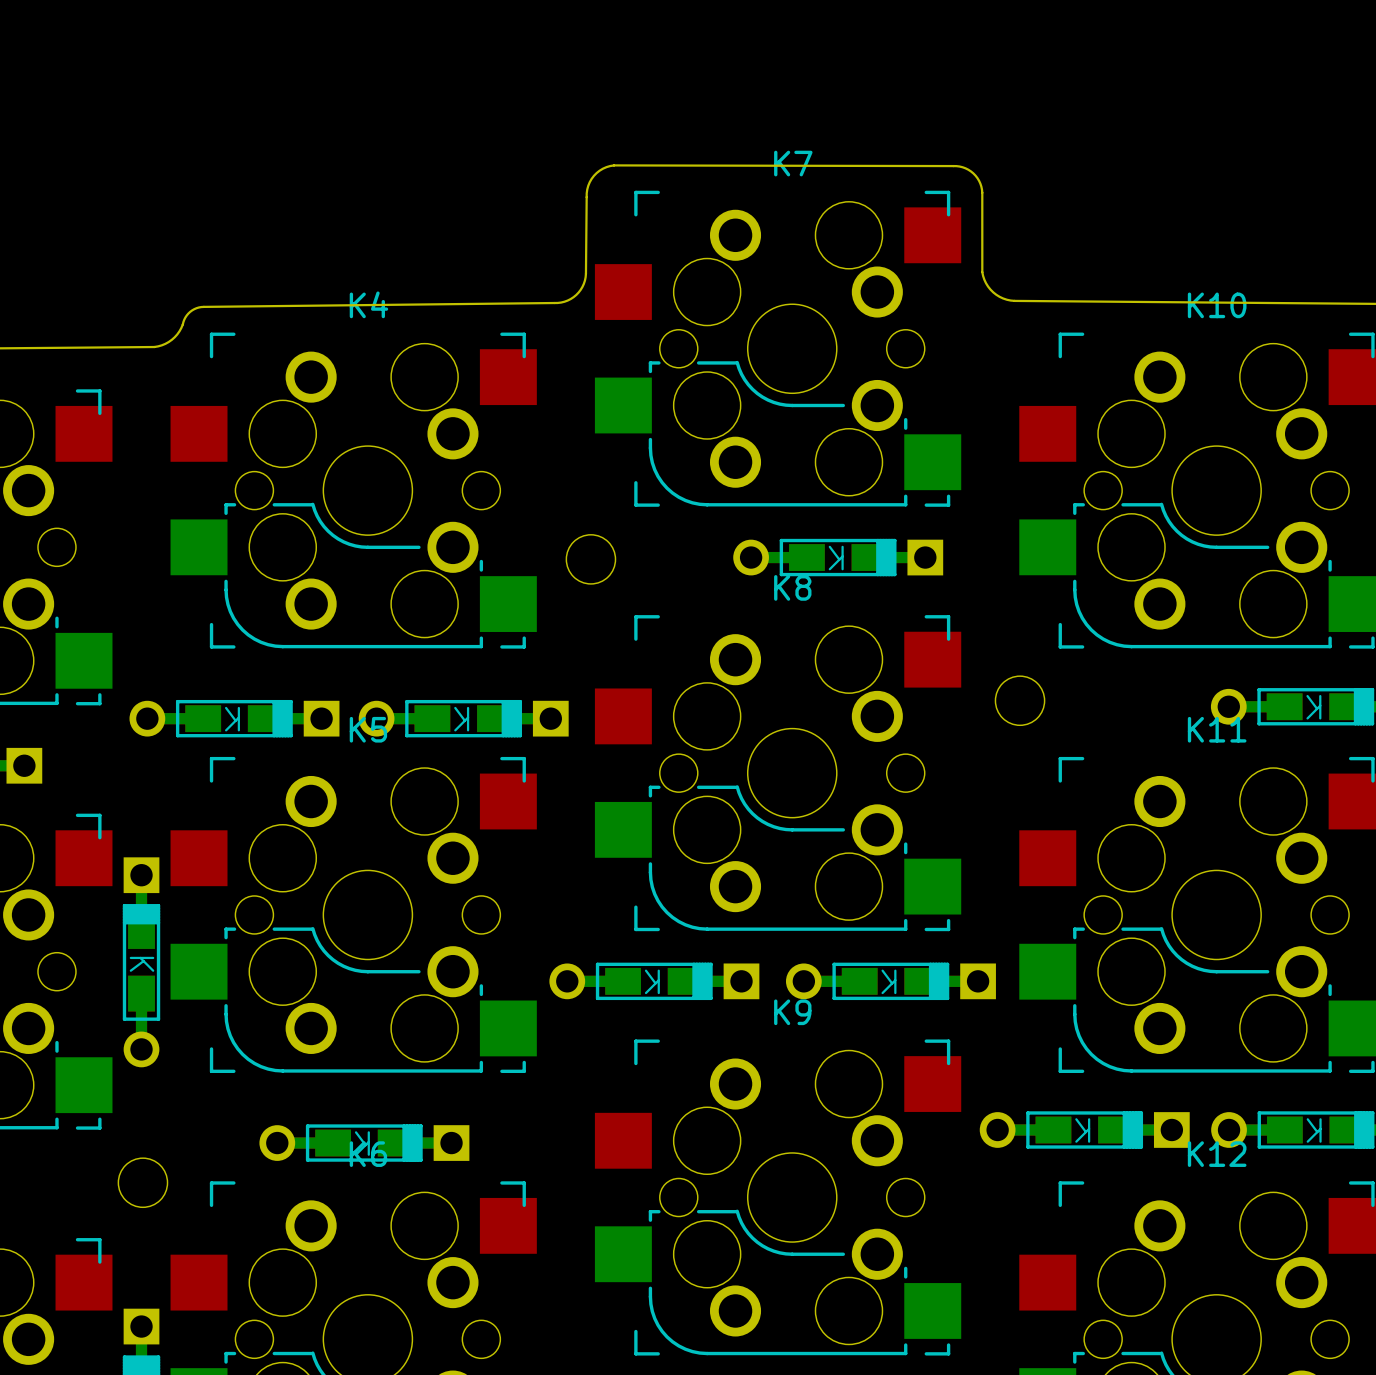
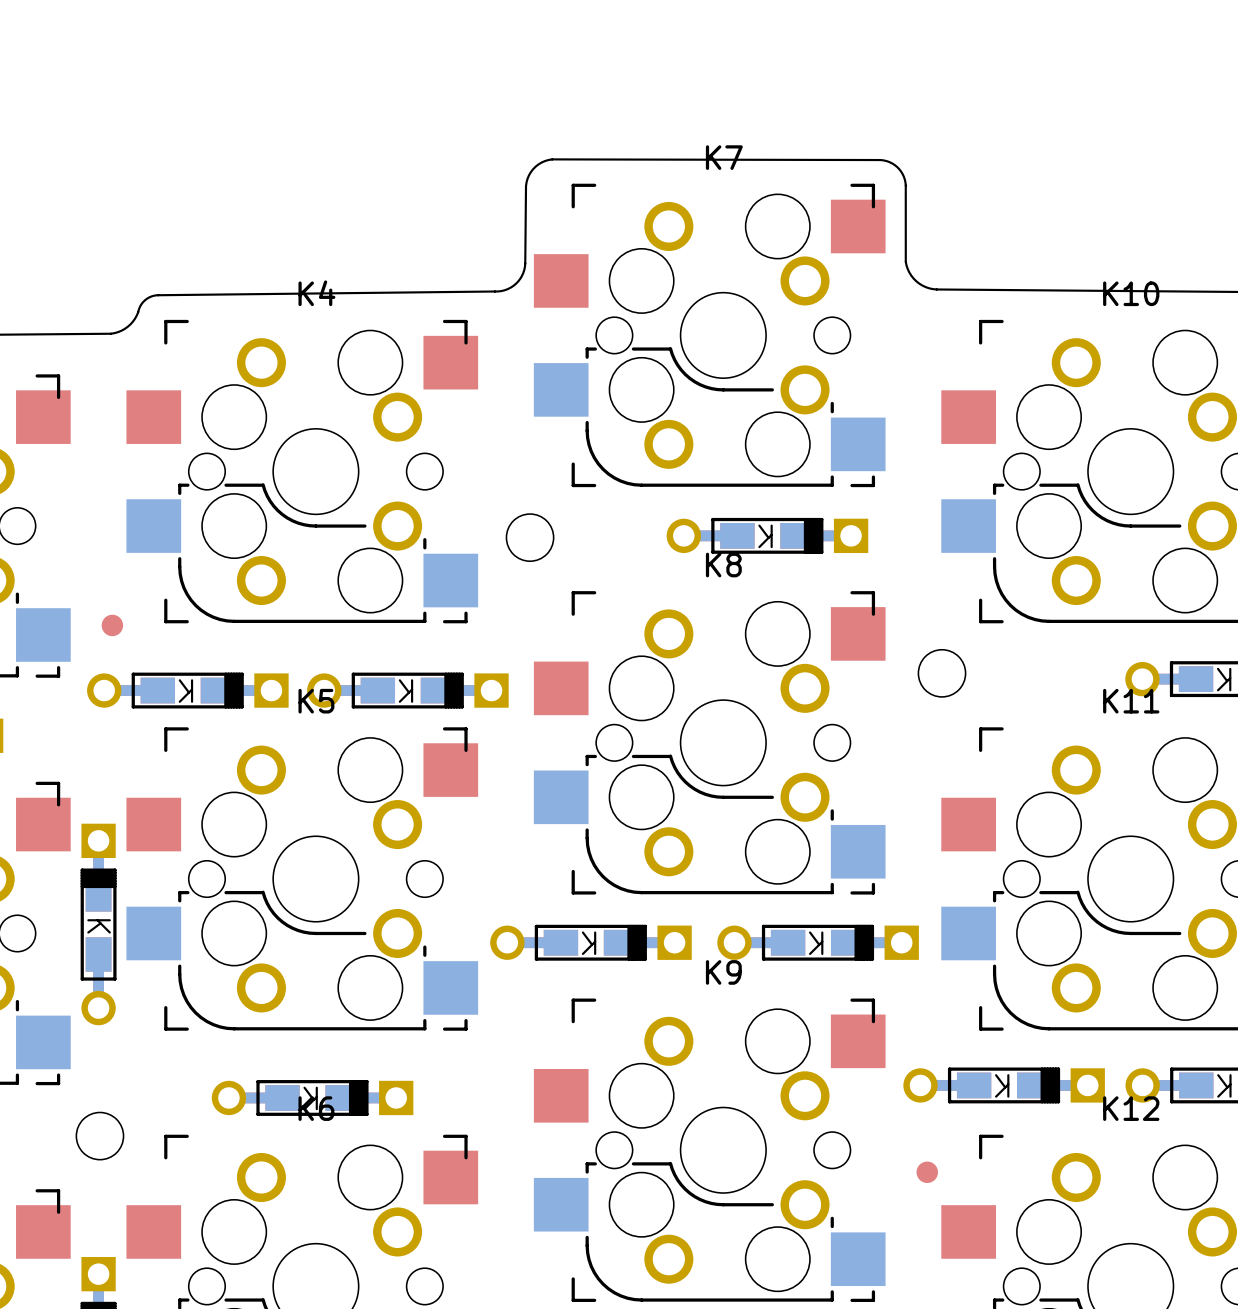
part: none -> (112, 625)
part: none -> (927, 1172)

